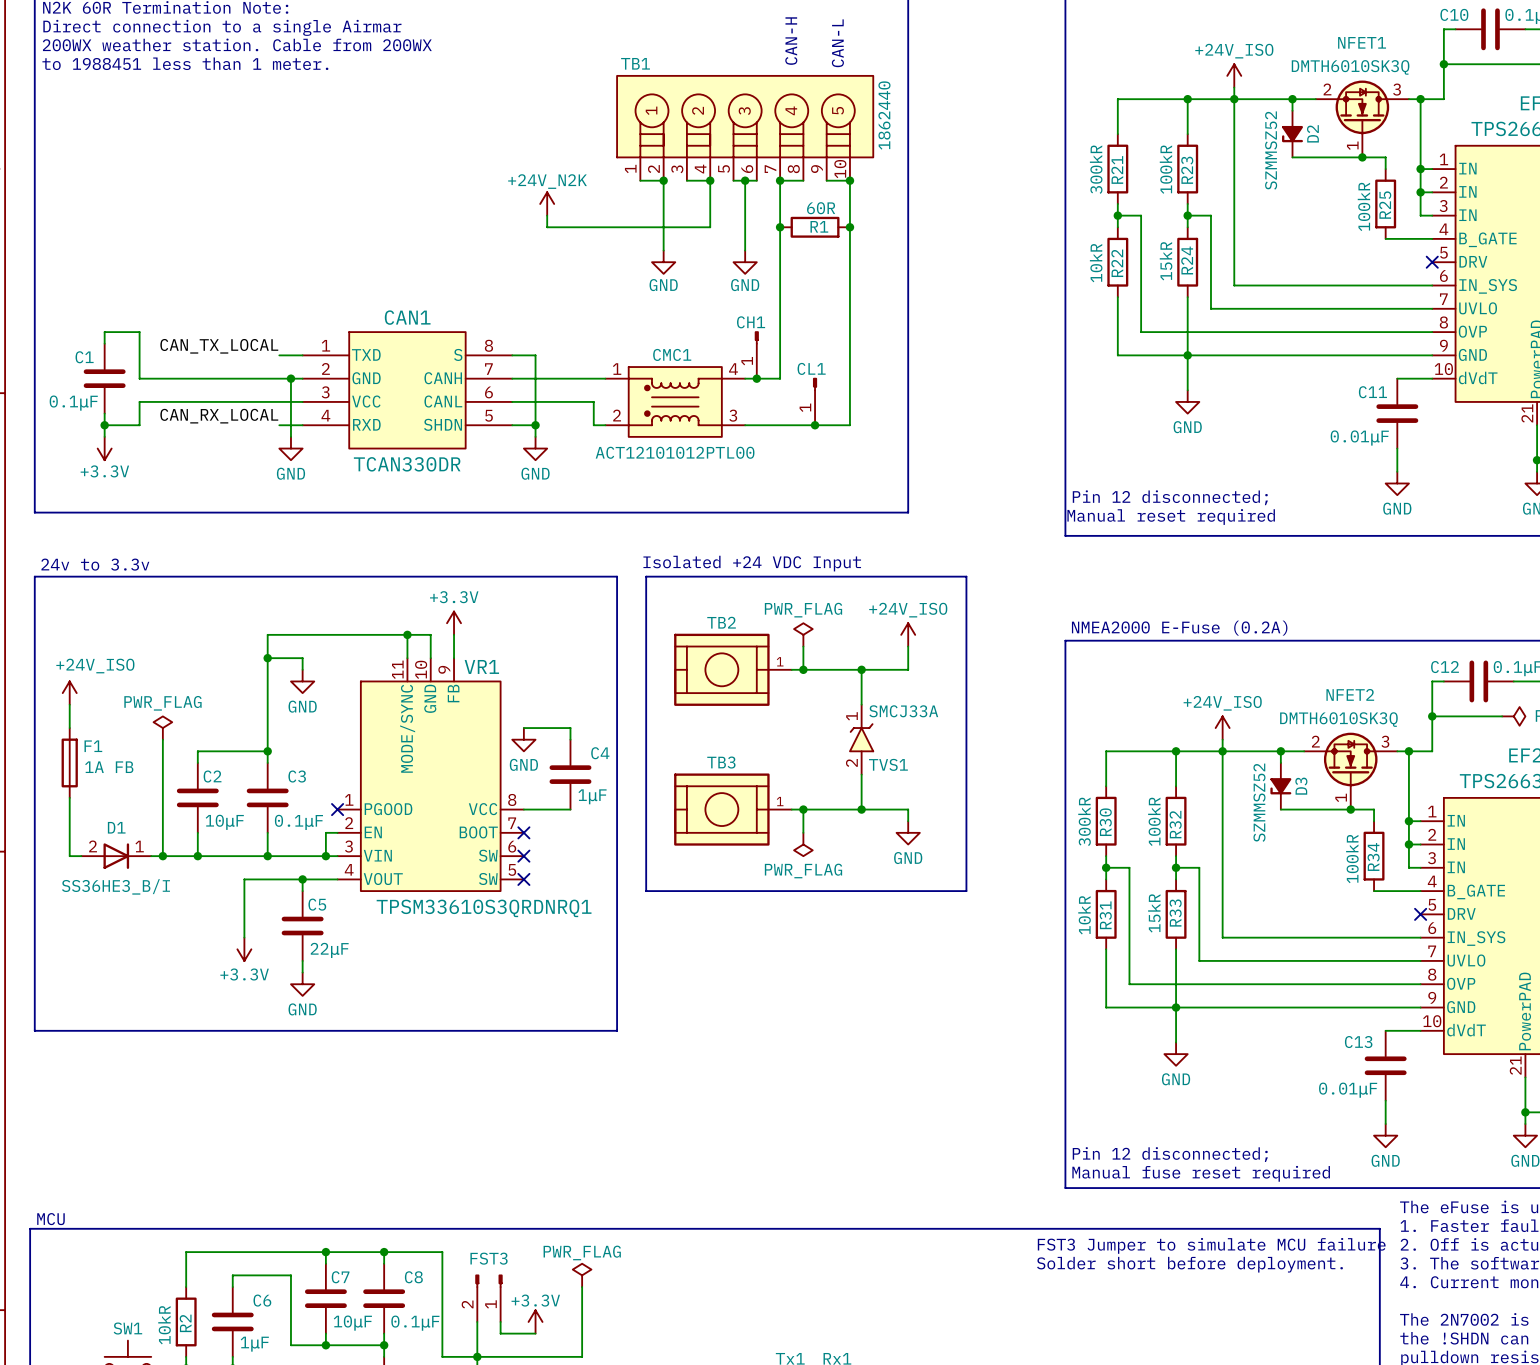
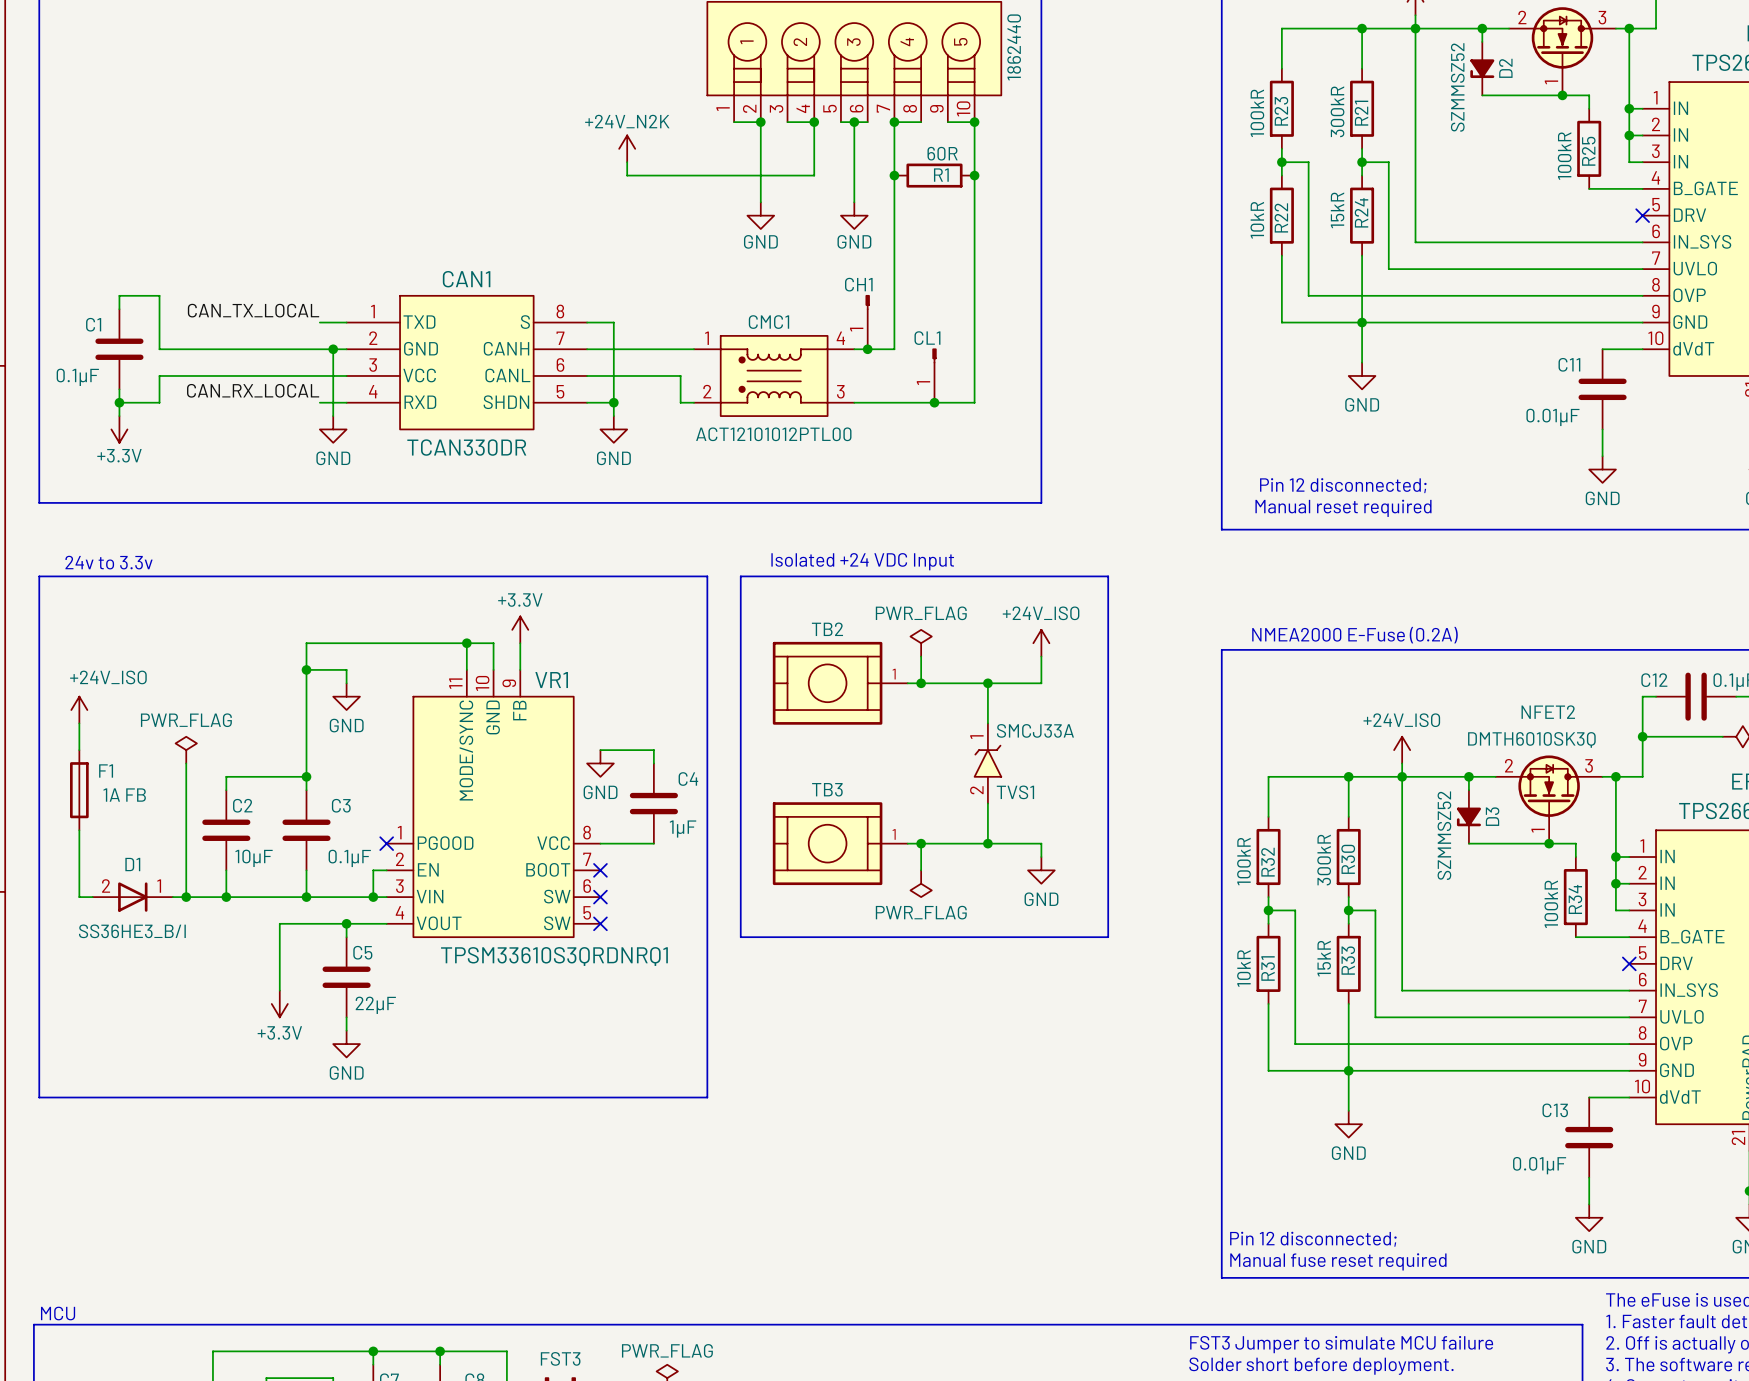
R21 value: 300kR (1096, 169) -> 100kR (1257, 113)
R21 name: R21 (1117, 169) -> R23 (1281, 111)
R23 value: 100kR (1166, 169) -> 300kR (1337, 111)
R23 name: R23 (1187, 170) -> R21 (1361, 113)
R30 value: 300kR (1084, 821) -> 100kR (1243, 861)
R32 value: 100kR (1154, 821) -> 300kR (1324, 860)
R30 name: R30 (1105, 822) -> R32 (1268, 862)
R32 name: R32 (1175, 824) -> R30 (1348, 859)

